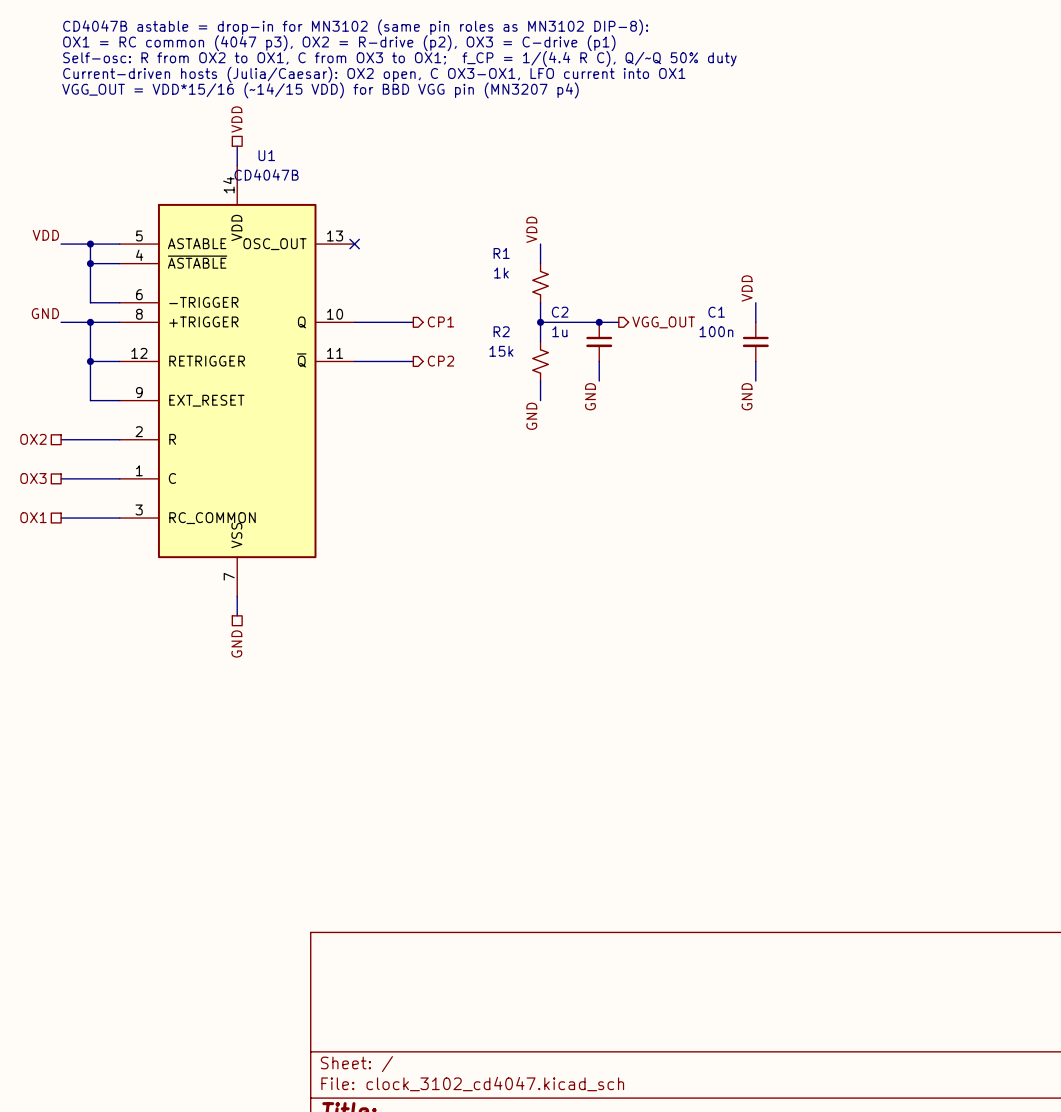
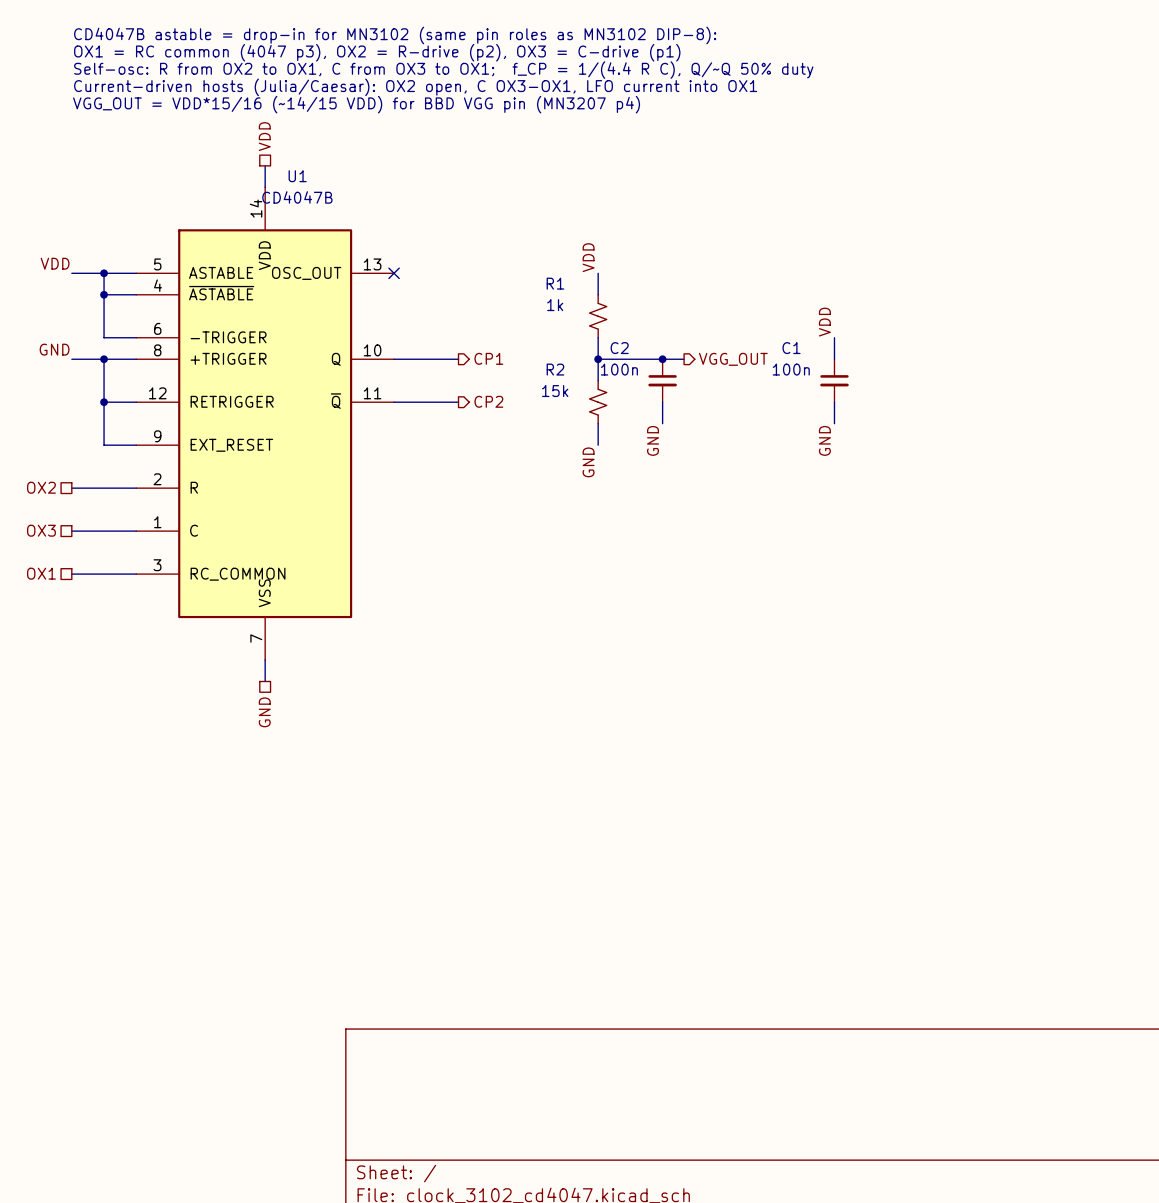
C2 value: 1u (559, 331) -> 100n (619, 369)

